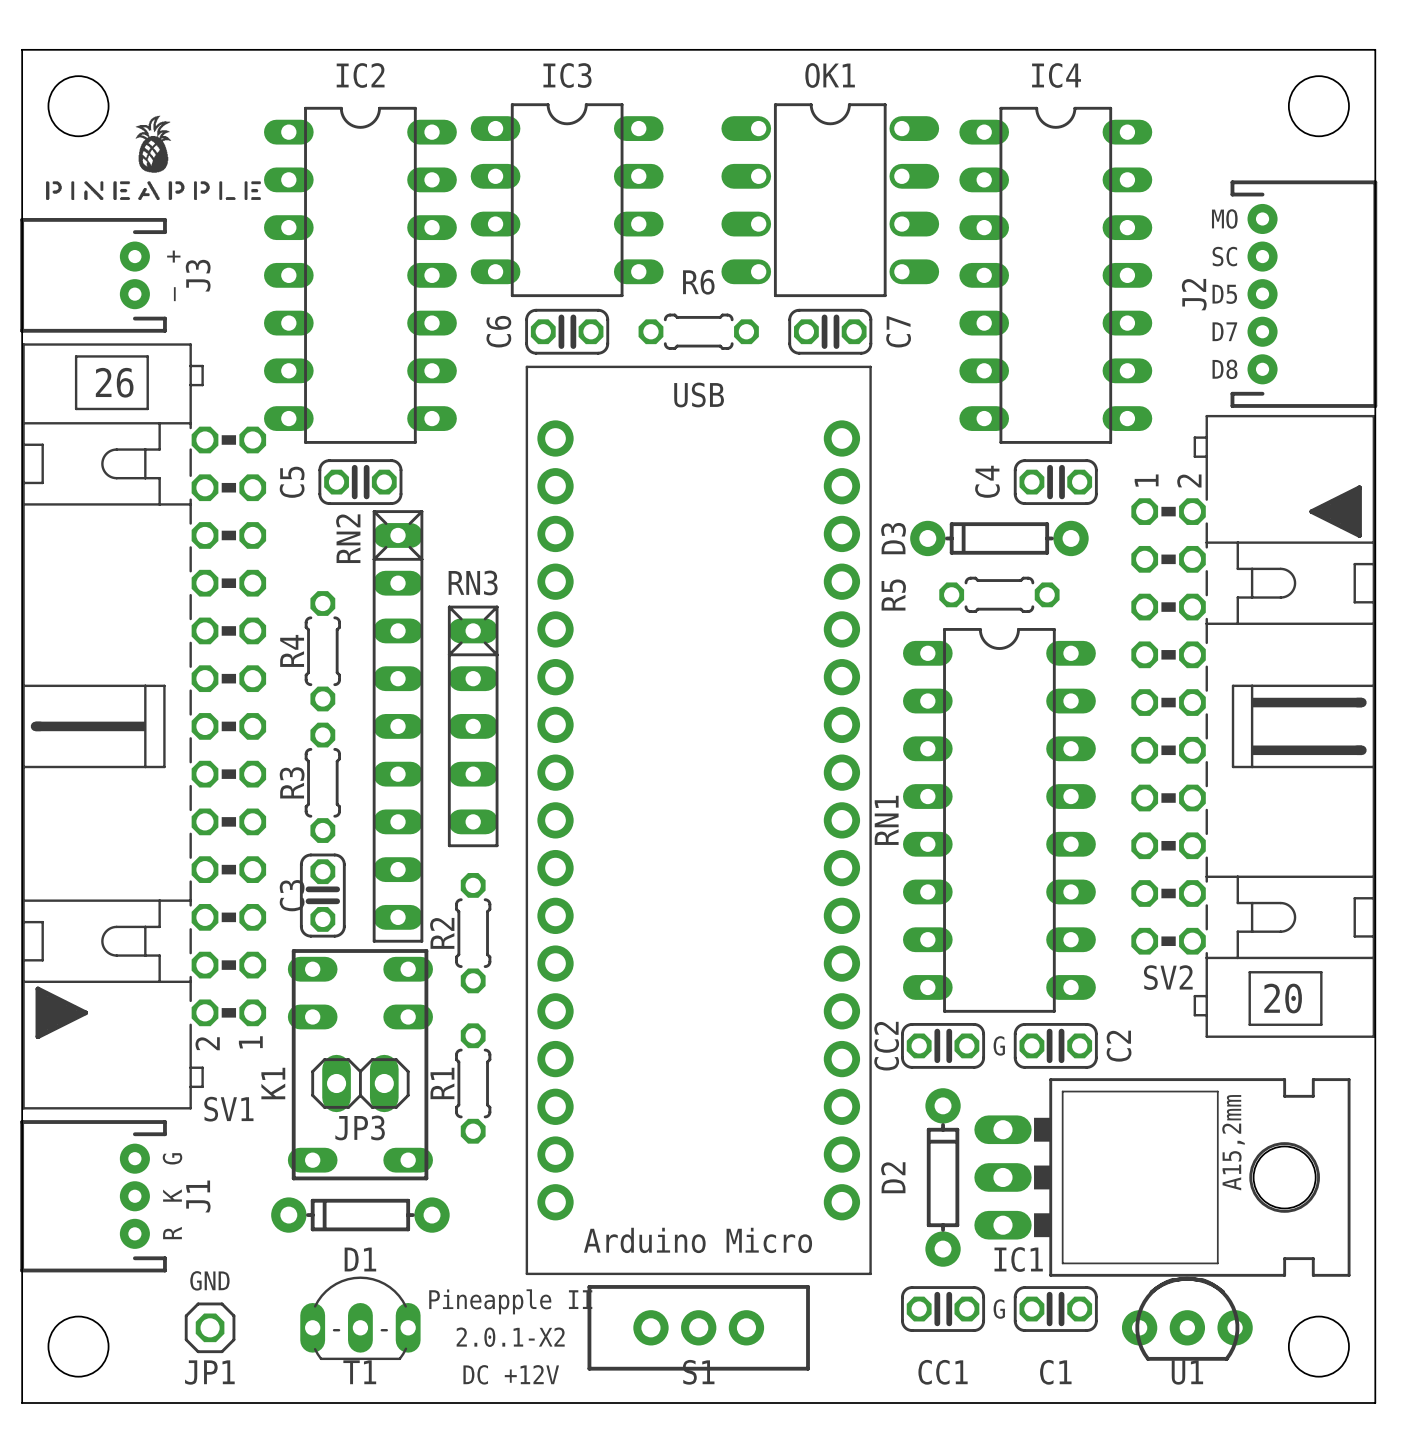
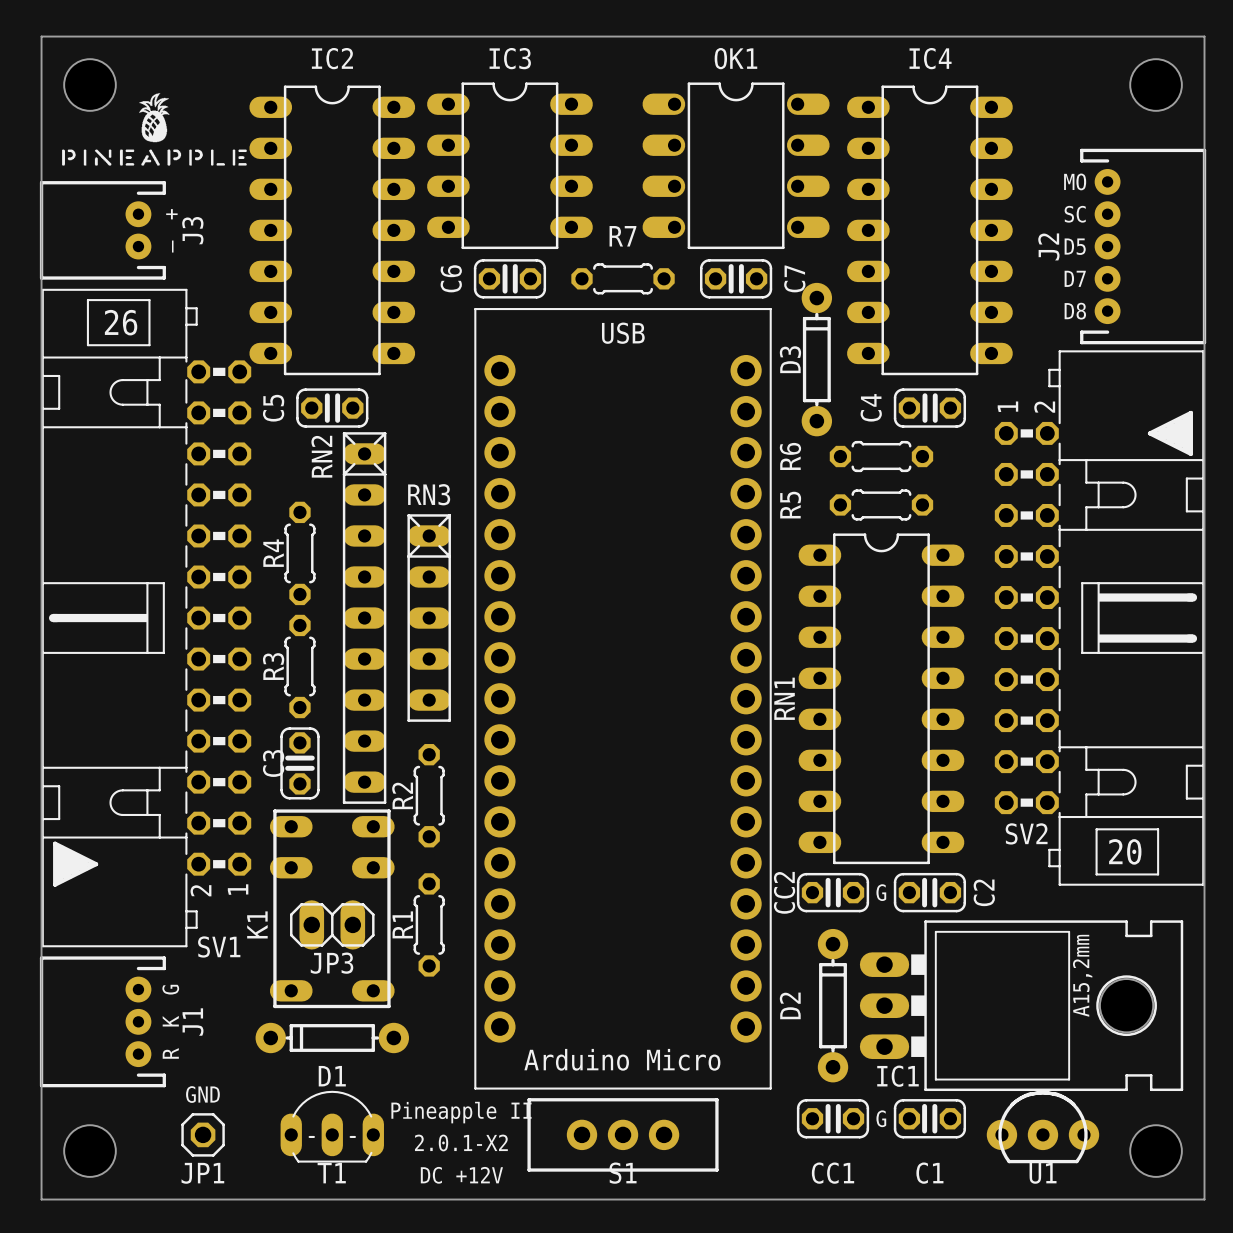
R6 name: R6 (698, 282) -> R7 (622, 236)
D3 name position: D3 (893, 538) -> D3 (790, 359)
D3 rotation: 0° (999, 538) -> 90° clockwise (816, 359)
D3 position: (999, 538) -> (816, 359)
R6: none -> (881, 456)

